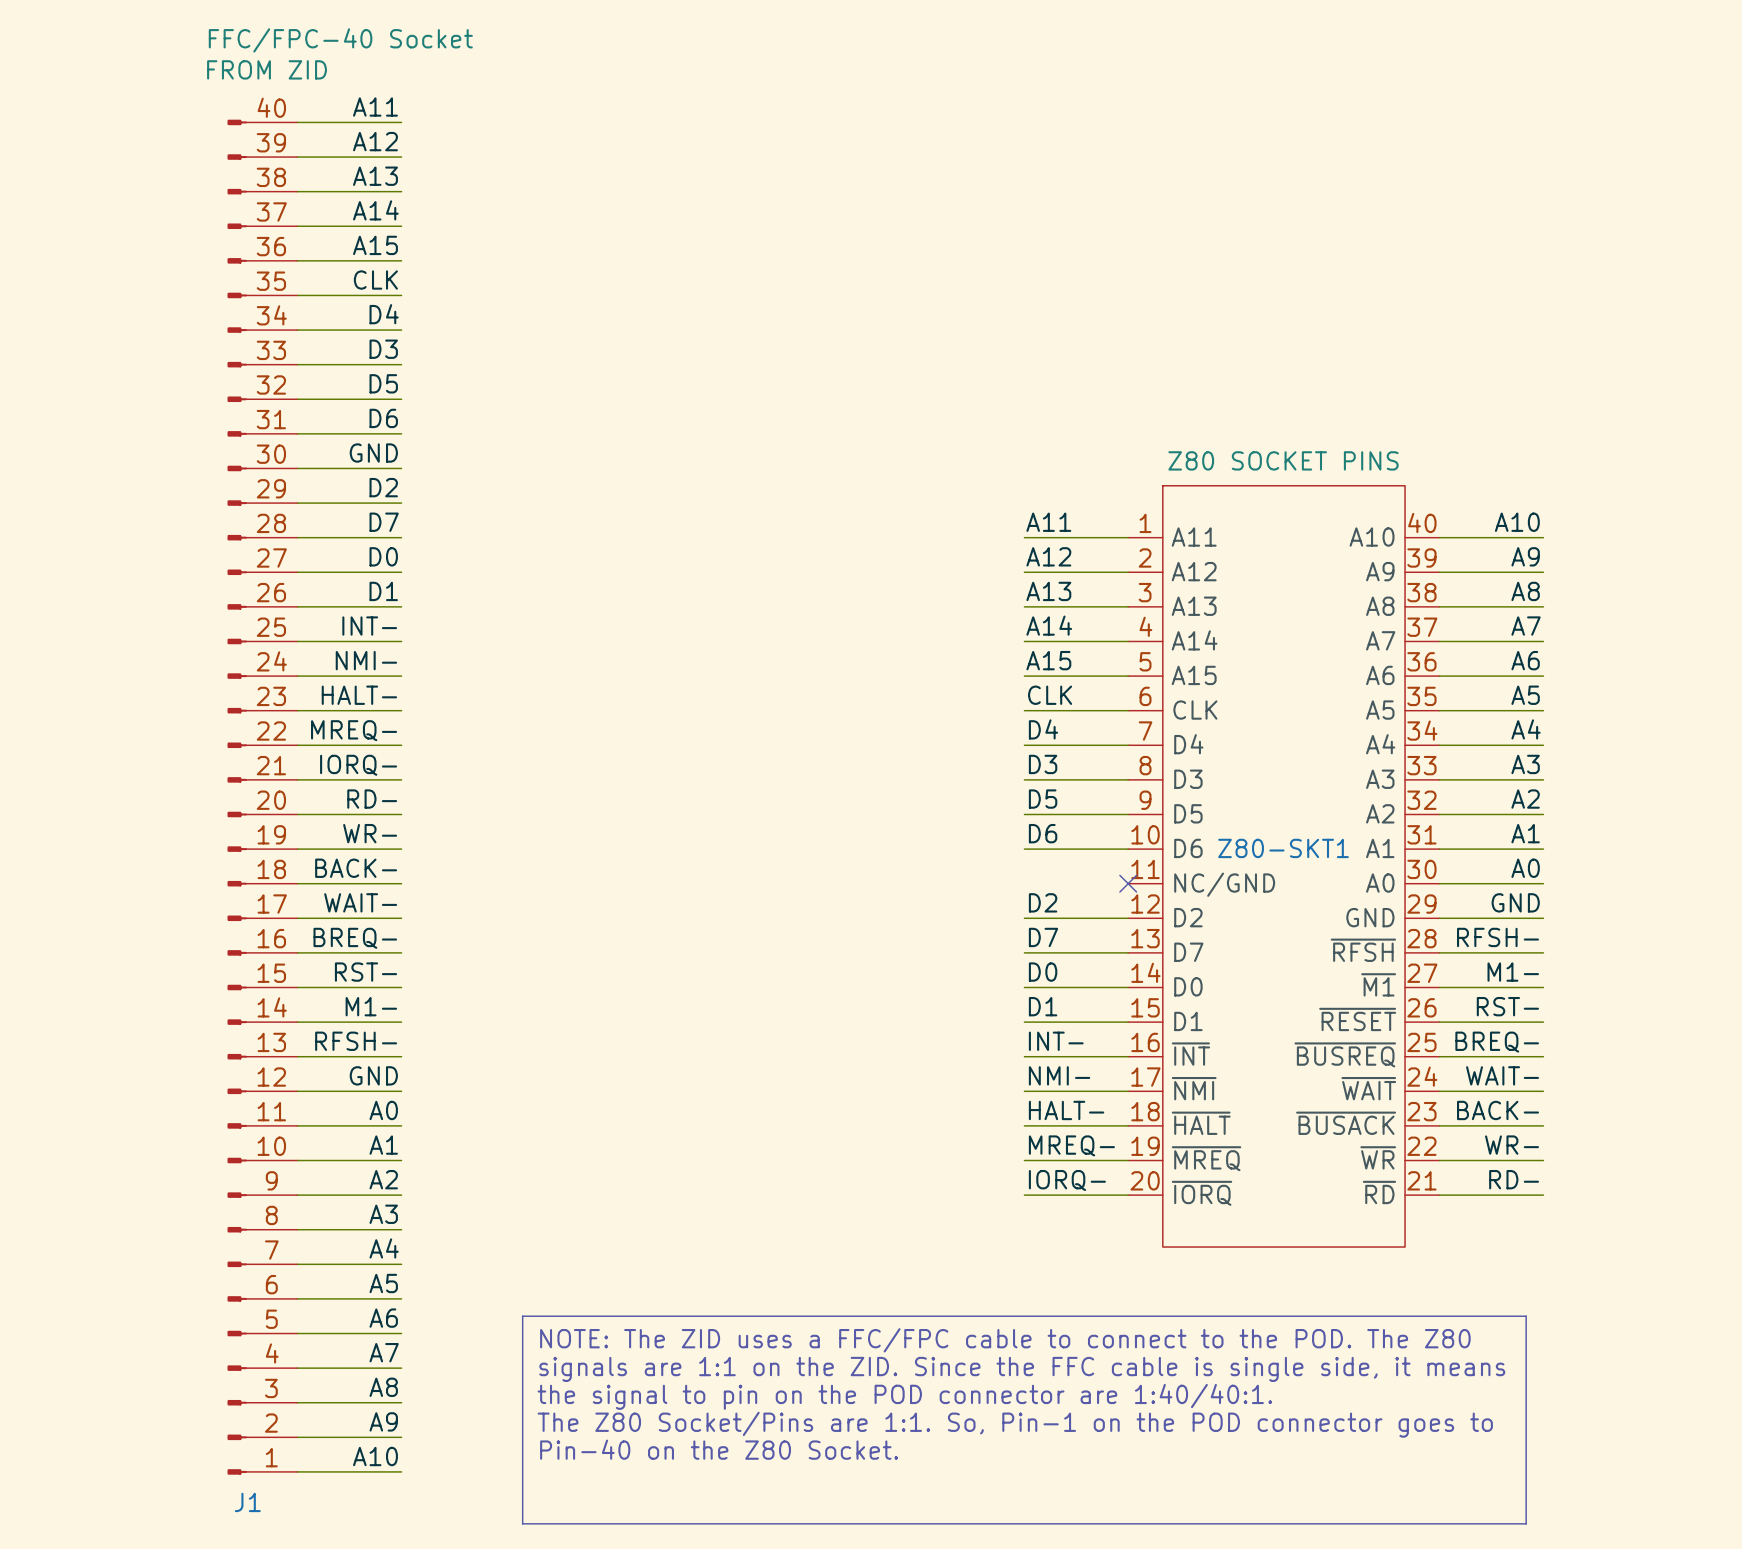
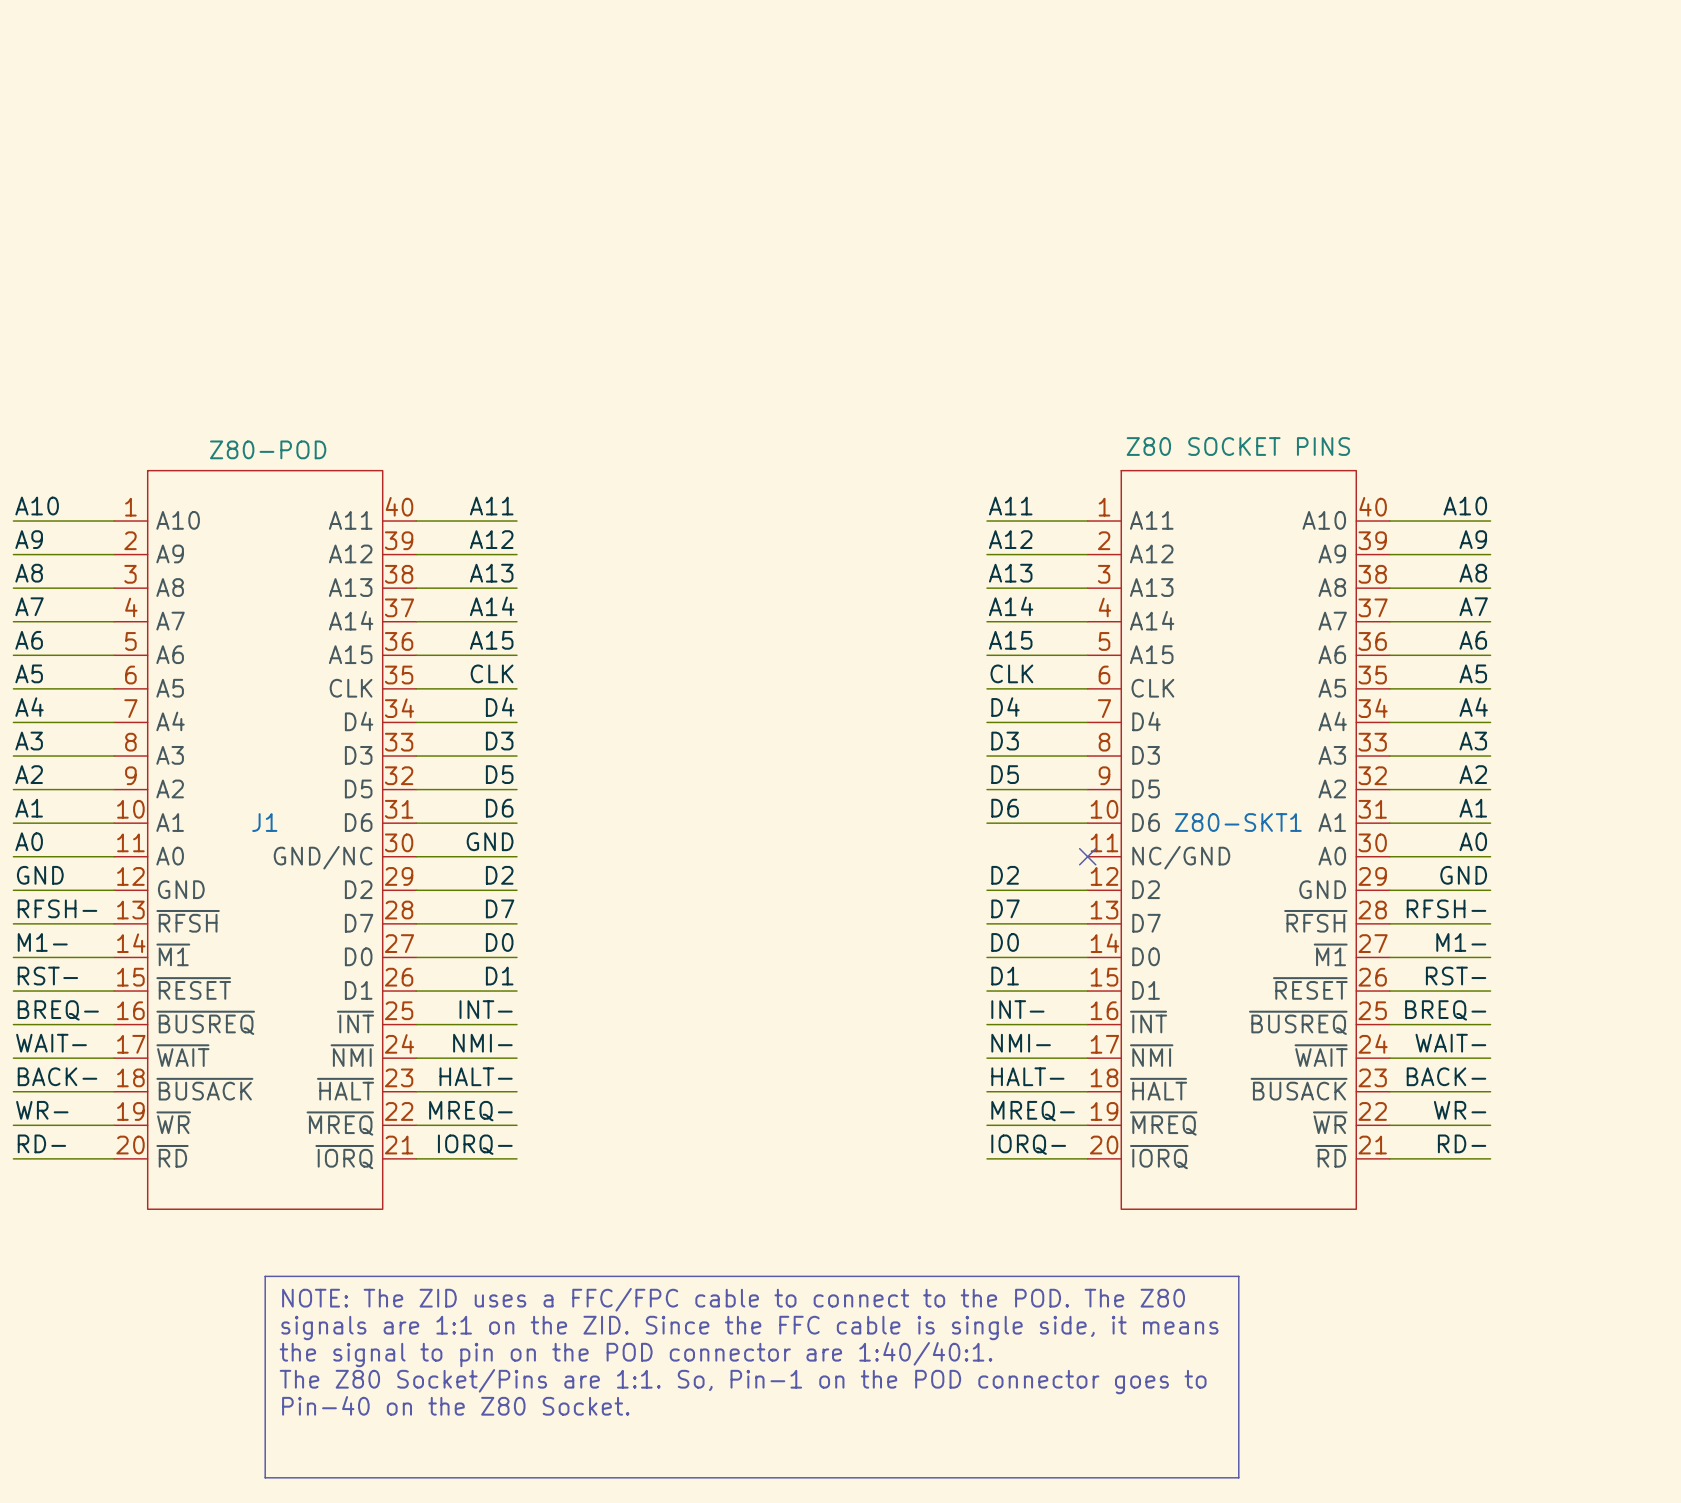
J1 value: FFC/FPC-40 Socket (340, 40) -> Z80-POD (268, 449)
J1 text: FROM ZID (267, 69) -> none
label: A11 (375, 107) -> none
J1 symbol: [227, 119, 298, 1475] -> [114, 470, 417, 1210]
wire: (297, 122) (401, 122) -> none
label: A12 (375, 141) -> none
wire: (297, 157) (401, 157) -> none
label: A13 (375, 176) -> none
wire: (297, 191) (401, 191) -> none
label: A14 (375, 210) -> none
wire: (297, 226) (401, 226) -> none
label: A15 (375, 245) -> none
wire: (297, 260) (401, 260) -> none
label: CLK (375, 280) -> none
wire: (297, 295) (401, 295) -> none
label: D4 (384, 314) -> none
wire: (297, 330) (401, 330) -> none
label: D3 (383, 349) -> none
wire: (297, 364) (401, 364) -> none
label: D5 (383, 383) -> none
wire: (297, 399) (401, 399) -> none
label: D6 (383, 418) -> none
wire: (297, 433) (401, 433) -> (13, 588) (114, 588)
label: GND (373, 453) -> none
wire: (297, 468) (401, 468) -> (13, 554) (114, 554)
label: D2 (383, 487) -> none
wire: (297, 503) (401, 503) -> (13, 521) (114, 521)
label: none -> A10 (37, 506)
label: D7 (384, 522) -> none
label: none -> A11 (491, 506)
wire: (297, 537) (401, 537) -> (416, 521) (516, 521)
label: none -> A9 (29, 539)
label: D0 (383, 556) -> none
label: none -> A12 (491, 539)
wire: (297, 572) (401, 572) -> (416, 554) (516, 554)
label: none -> A8 (29, 573)
label: D1 (383, 591) -> none
label: none -> A13 (491, 573)
wire: (297, 606) (401, 606) -> (416, 588) (516, 588)
label: none -> A14 (492, 606)
label: none -> A7 (29, 606)
label: INT- (369, 626) -> none
wire: none -> (13, 621) (114, 621)
wire: (297, 641) (401, 641) -> (416, 621) (516, 621)
label: none -> A6 (29, 640)
label: NMI- (366, 660) -> none
label: none -> A15 (491, 640)
wire: none -> (13, 655) (114, 655)
wire: (297, 676) (401, 676) -> (416, 655) (516, 655)
label: none -> A5 (29, 673)
label: HALT- (359, 695) -> none
label: none -> CLK (492, 673)
wire: none -> (13, 688) (114, 688)
wire: (297, 710) (401, 710) -> (416, 688) (516, 688)
label: none -> A4 (29, 707)
label: none -> D4 (500, 707)
label: MREQ- (354, 730) -> none
wire: none -> (13, 722) (114, 722)
wire: (297, 745) (401, 745) -> (416, 722) (516, 722)
label: none -> A3 (29, 741)
label: none -> D3 (499, 741)
label: IORQ- (358, 765) -> none
wire: none -> (13, 756) (114, 756)
wire: (297, 779) (401, 779) -> (416, 756) (516, 756)
label: none -> A2 (29, 774)
label: RD- (372, 799) -> none
label: none -> D5 (499, 774)
wire: none -> (13, 789) (114, 789)
wire: (297, 814) (401, 814) -> (416, 789) (516, 789)
label: none -> A1 (29, 808)
label: WR- (370, 833) -> none
label: none -> D6 (499, 808)
wire: none -> (13, 823) (114, 823)
wire: (297, 849) (401, 849) -> (416, 823) (516, 823)
label: none -> A0 (29, 841)
label: BACK- (356, 868) -> none
label: none -> GND (490, 841)
wire: none -> (13, 856) (114, 856)
wire: (297, 883) (401, 883) -> (416, 856) (516, 856)
label: none -> GND (40, 875)
label: WAIT- (360, 902) -> none
label: none -> D2 (499, 875)
wire: none -> (13, 890) (114, 890)
wire: (297, 918) (401, 918) -> (416, 890) (516, 890)
label: none -> RFSH- (57, 908)
label: none -> D7 (500, 908)
label: BREQ- (355, 938) -> none
wire: none -> (13, 923) (114, 923)
wire: (297, 952) (401, 952) -> (416, 923) (516, 923)
label: none -> M1- (42, 942)
label: RST- (366, 972) -> none
label: none -> D0 (499, 942)
wire: none -> (13, 957) (114, 957)
wire: (297, 987) (401, 987) -> (416, 957) (516, 957)
label: none -> RST- (47, 976)
label: M1- (371, 1006) -> none
label: none -> D1 (499, 976)
wire: none -> (13, 991) (114, 991)
wire: (297, 1022) (401, 1022) -> (416, 991) (516, 991)
label: RFSH- (356, 1041) -> none
label: none -> INT- (486, 1009)
label: none -> BREQ- (58, 1010)
wire: none -> (13, 1024) (114, 1024)
wire: (297, 1056) (401, 1056) -> (416, 1024) (516, 1024)
label: none -> WAIT- (51, 1043)
label: GND (373, 1075) -> none
label: none -> NMI- (482, 1043)
wire: none -> (13, 1058) (114, 1058)
wire: (297, 1091) (401, 1091) -> (416, 1058) (516, 1058)
label: none -> BACK- (57, 1076)
label: A0 (383, 1110) -> none
label: none -> HALT- (476, 1076)
wire: (297, 1125) (401, 1125) -> (416, 1091) (516, 1091)
label: none -> WR- (42, 1110)
label: A1 (383, 1145) -> none
label: none -> MREQ- (470, 1111)
wire: (297, 1160) (401, 1160) -> (416, 1125) (516, 1125)
label: none -> RD- (41, 1143)
label: A2 (383, 1179) -> none
label: none -> IORQ- (475, 1144)
wire: (297, 1195) (401, 1195) -> (416, 1158) (516, 1158)
label: A3 (383, 1214) -> none
wire: (297, 1229) (401, 1229) -> (13, 1158) (114, 1158)
label: A4 (384, 1248) -> none
wire: (297, 1264) (401, 1264) -> (13, 1125) (114, 1125)
label: A5 (383, 1283) -> none
wire: (297, 1298) (401, 1298) -> (13, 1091) (114, 1091)
line: (522, 1316) (522, 1523) -> (500, 1276) (265, 1276) (265, 1477) (500, 1477)
line: (1283, 1316) (1526, 1316) (1526, 1523) (1283, 1523) -> (1238, 1276) (1238, 1477)
label: A6 (383, 1318) -> none
wire: (297, 1333) (401, 1333) -> none
text position: NOTE: The ZID uses a FFC/FPC cable to connect to the POD. The Z80 (1005, 1340) -> NOTE: The ZID uses a FFC/FPC cable to connect to the POD. The Z80 (733, 1299)
label: A7 (384, 1352) -> none
wire: (297, 1368) (401, 1368) -> none
text position: signals are 1:1 on the ZID. Since the FFC cable is single side, it means (1022, 1369) -> signals are 1:1 on the ZID. Since the FFC cable is single side, it means (749, 1327)
label: A8 (383, 1387) -> none
text position: the signal to pin on the POD connector are 1:40/40:1. (904, 1396) -> the signal to pin on the POD connector are 1:40/40:1. (636, 1354)
wire: (297, 1402) (401, 1402) -> none
label: A9 (383, 1421) -> none
text position: The Z80 Socket/Pins are 1:1. So, Pin-1 on the POD connector goes to (1015, 1424) -> The Z80 Socket/Pins are 1:1. So, Pin-1 on the POD connector goes to (743, 1381)
wire: (297, 1437) (401, 1437) -> none
text position: Pin-40 on the Z80 Socket. (719, 1449) -> Pin-40 on the Z80 Socket. (455, 1405)
label: A10 (375, 1456) -> none
wire: (297, 1471) (401, 1471) -> none
J1 name position: J1 (247, 1502) -> J1 (264, 822)

